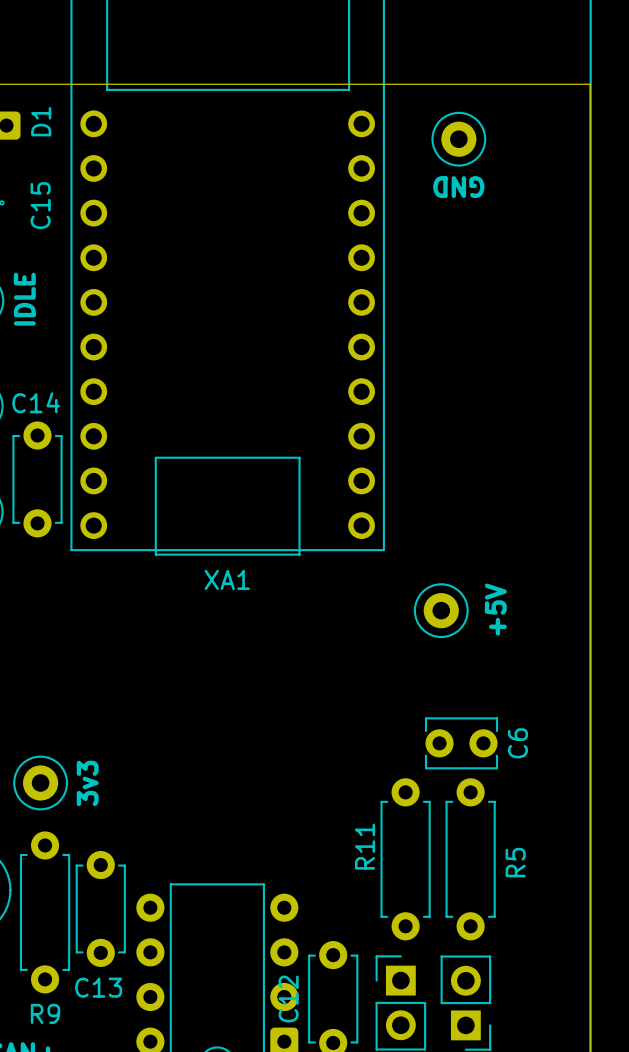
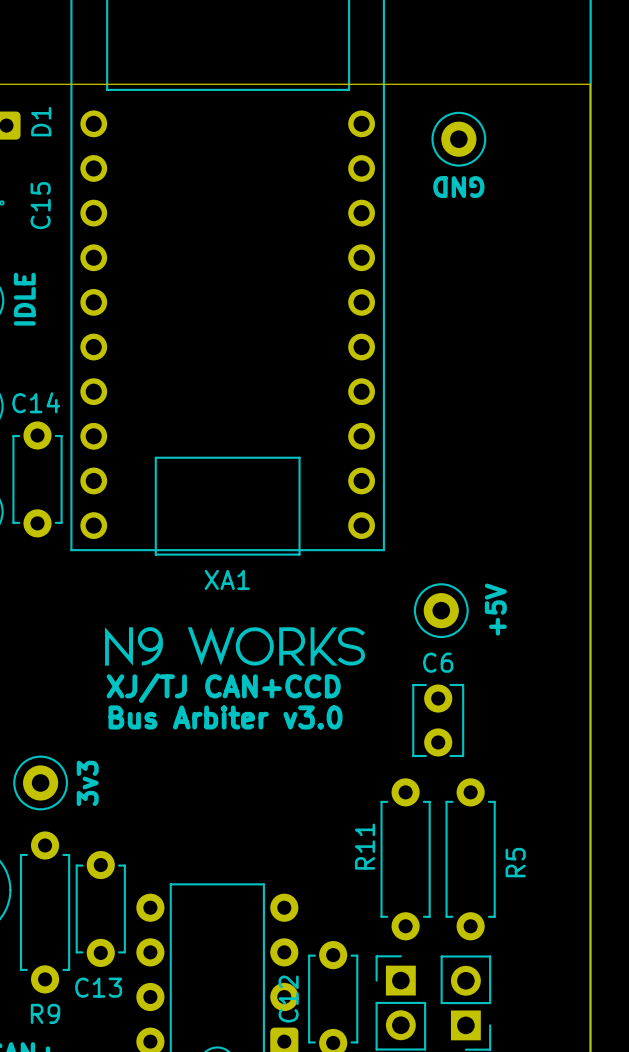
drawing: none -> [105, 627, 366, 666]
text: none -> XJ/TJ CAN+CCD (223, 688)
text: none -> Bus Arbiter v3.0 (225, 717)
C6 rotation: 0° (461, 743) -> 90° clockwise (438, 720)
C6 name position: C6 (517, 743) -> C6 (438, 662)

